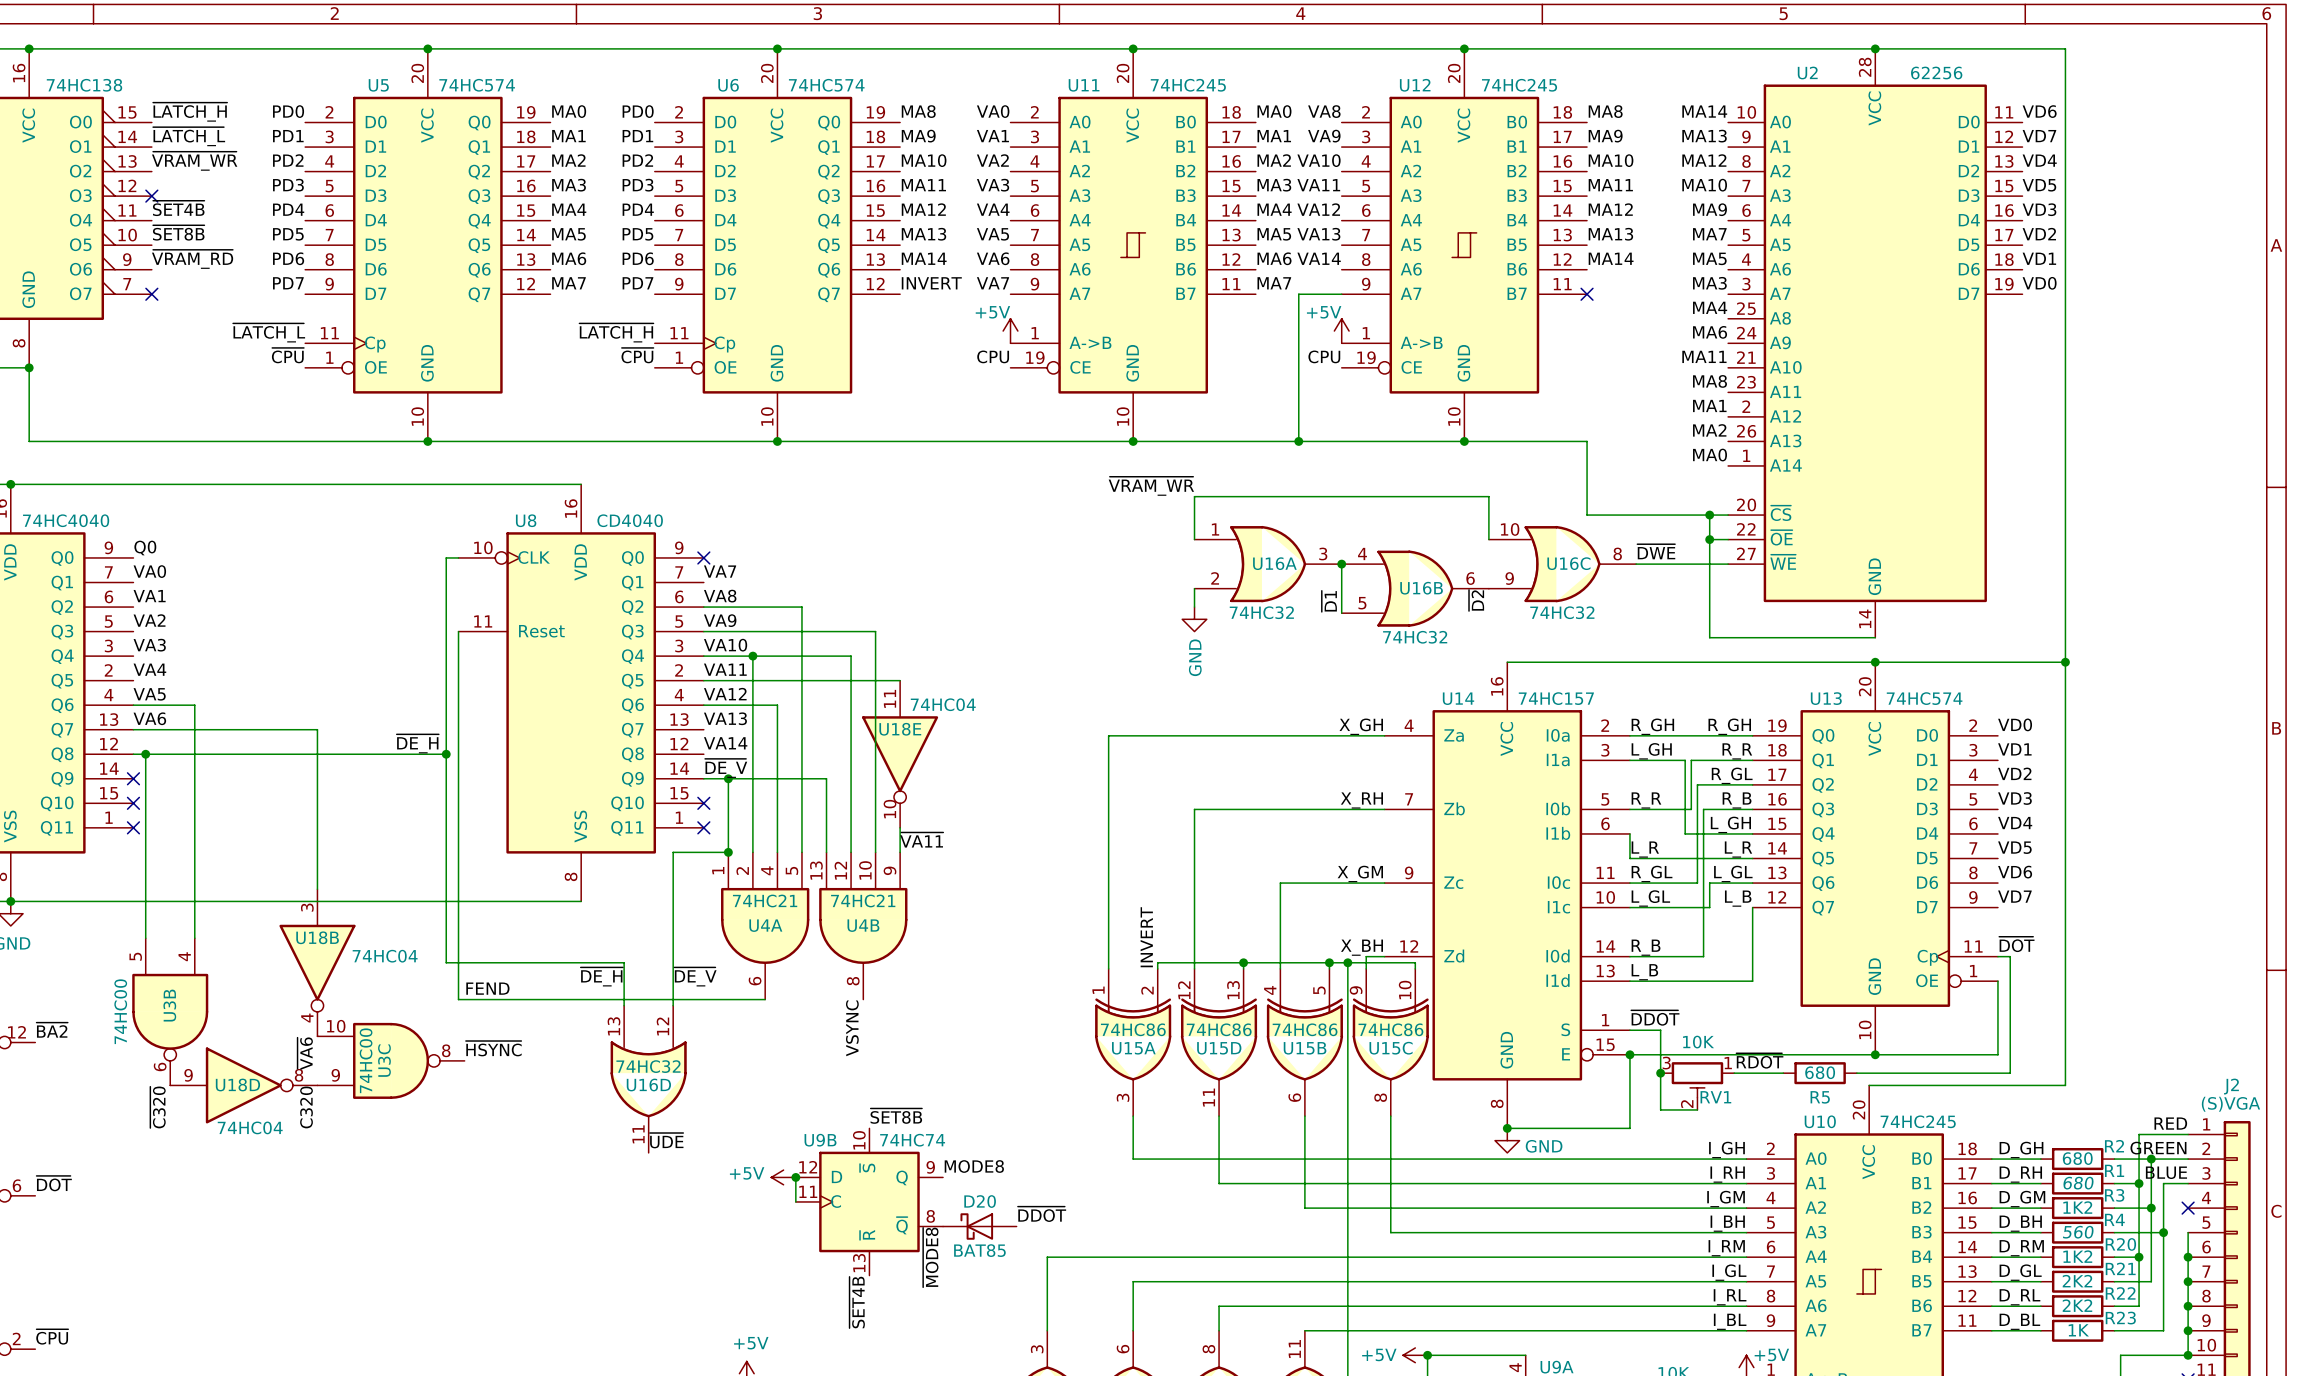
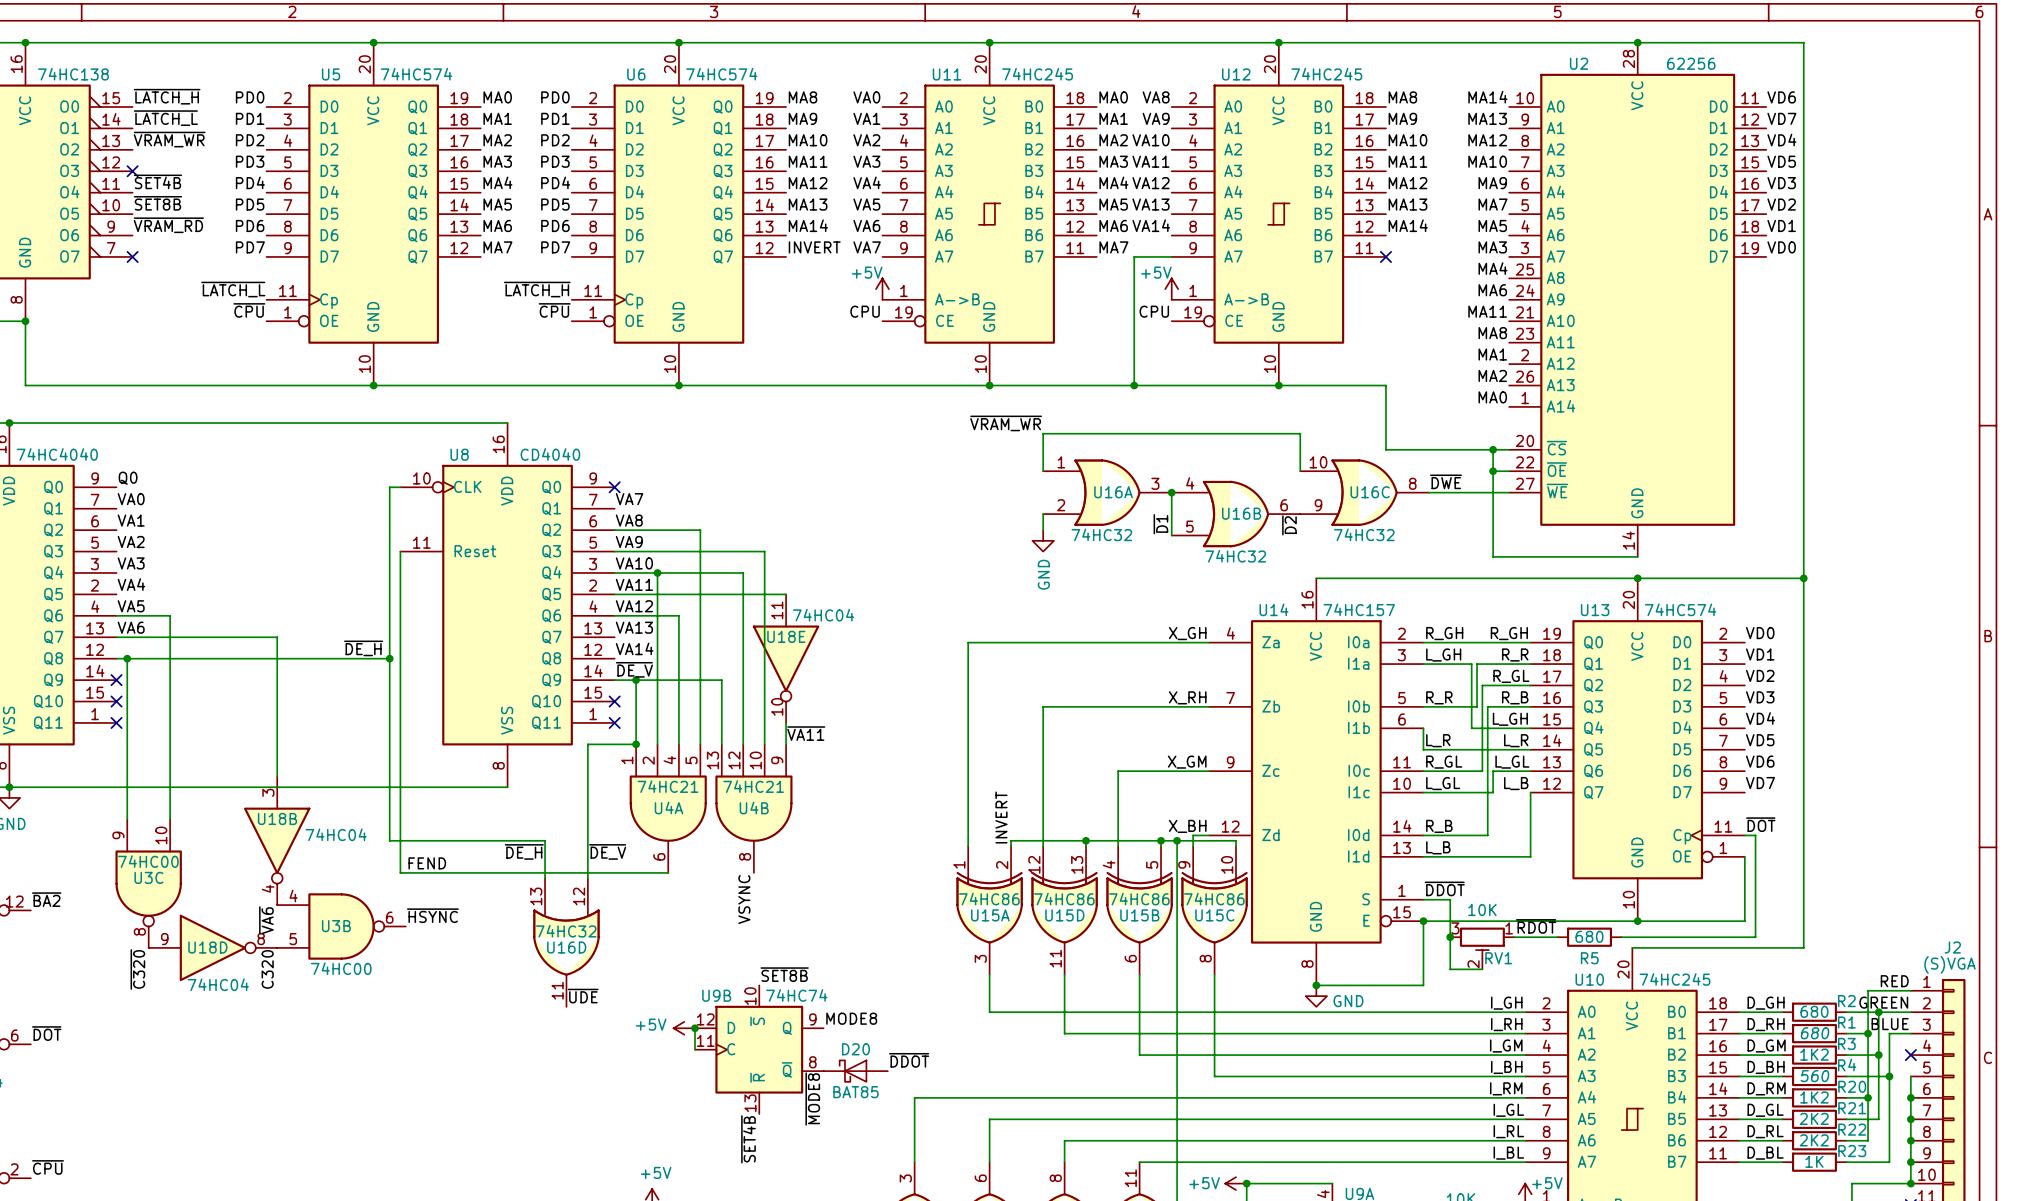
U3B rotation: 0° (170, 1011) -> 90° counterclockwise (341, 926)
U3B position: (170, 1011) -> (341, 926)
U3C rotation: 0° (391, 1060) -> 90° clockwise (148, 883)
U3C position: (391, 1060) -> (148, 883)

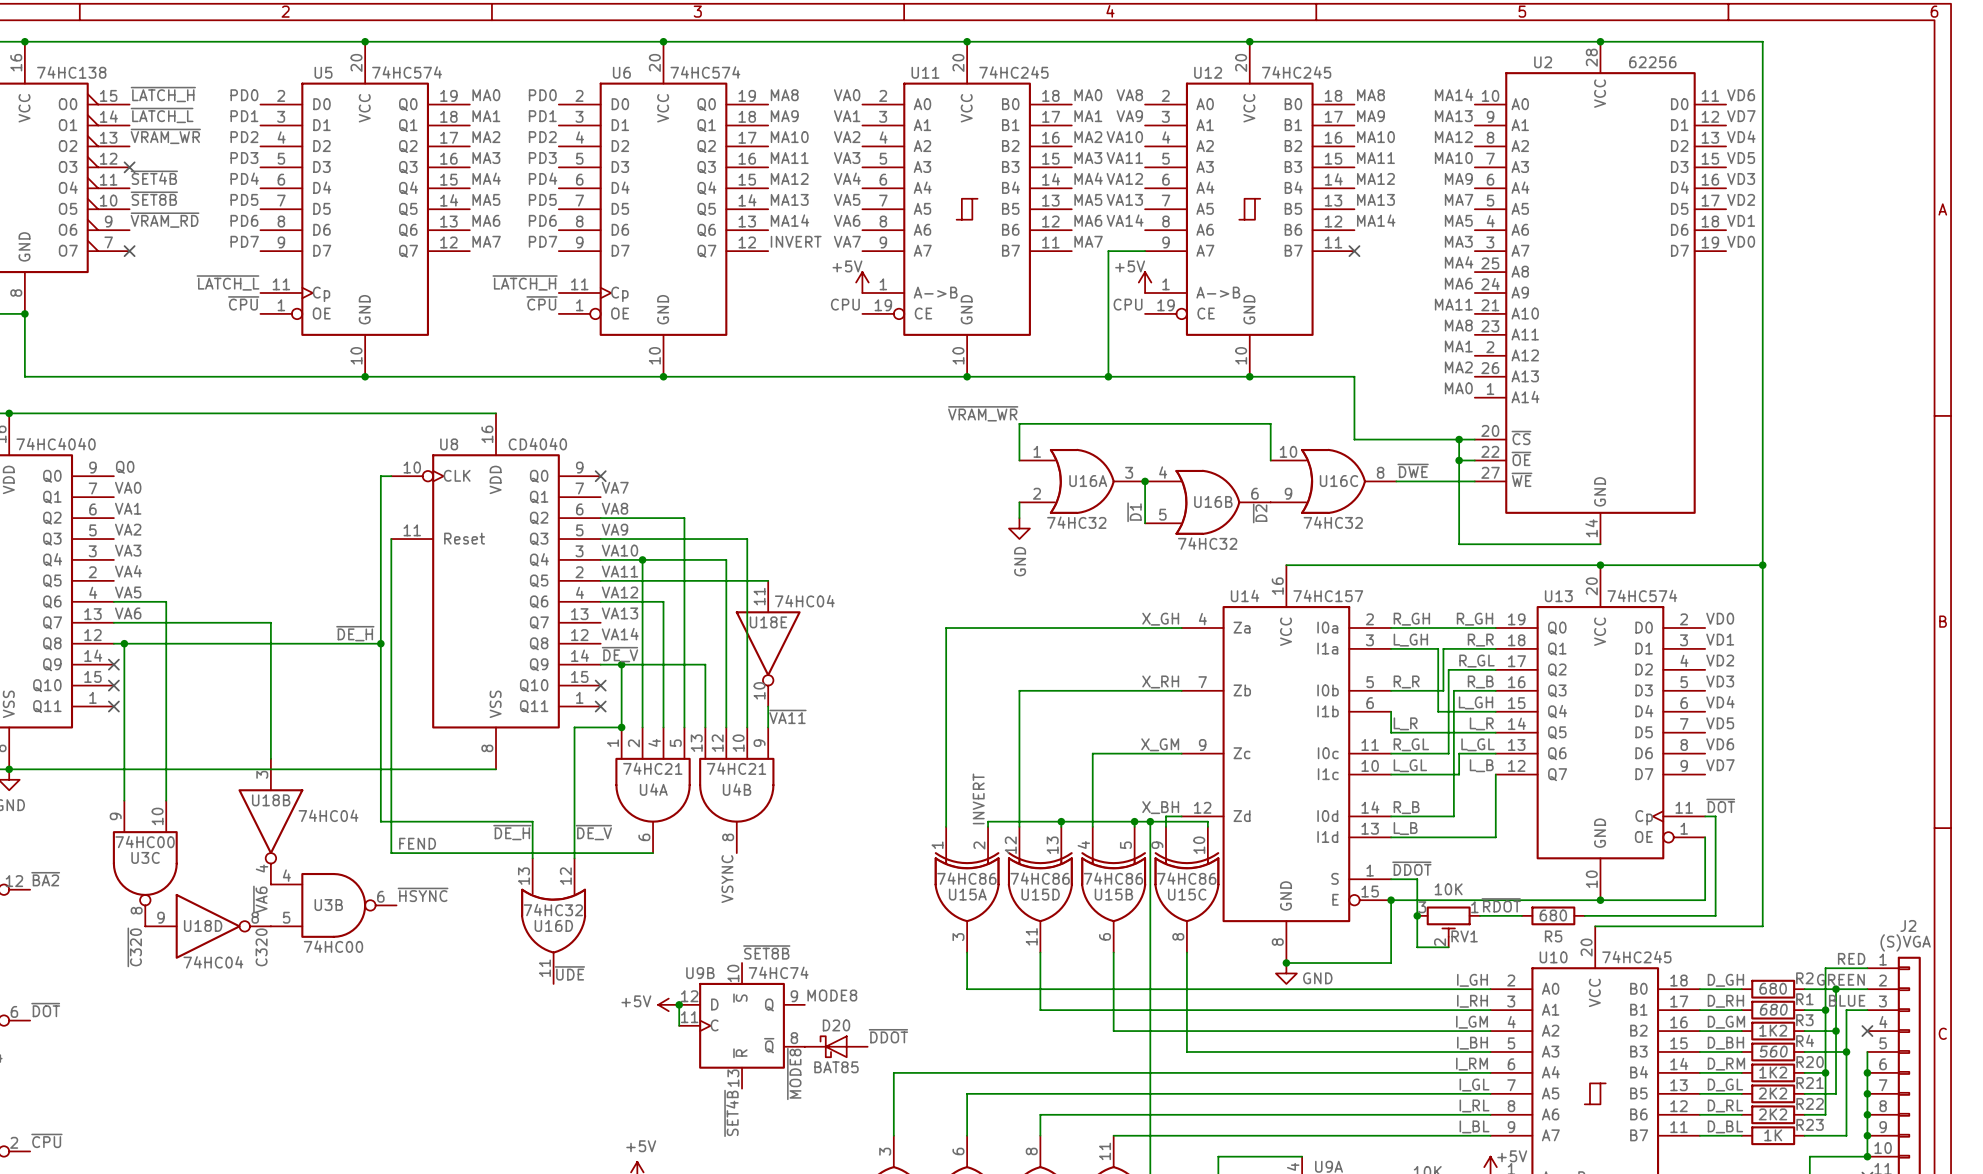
power symbol: +5V (1236, 1183) -> none
junction: (1246, 1183) -> none

